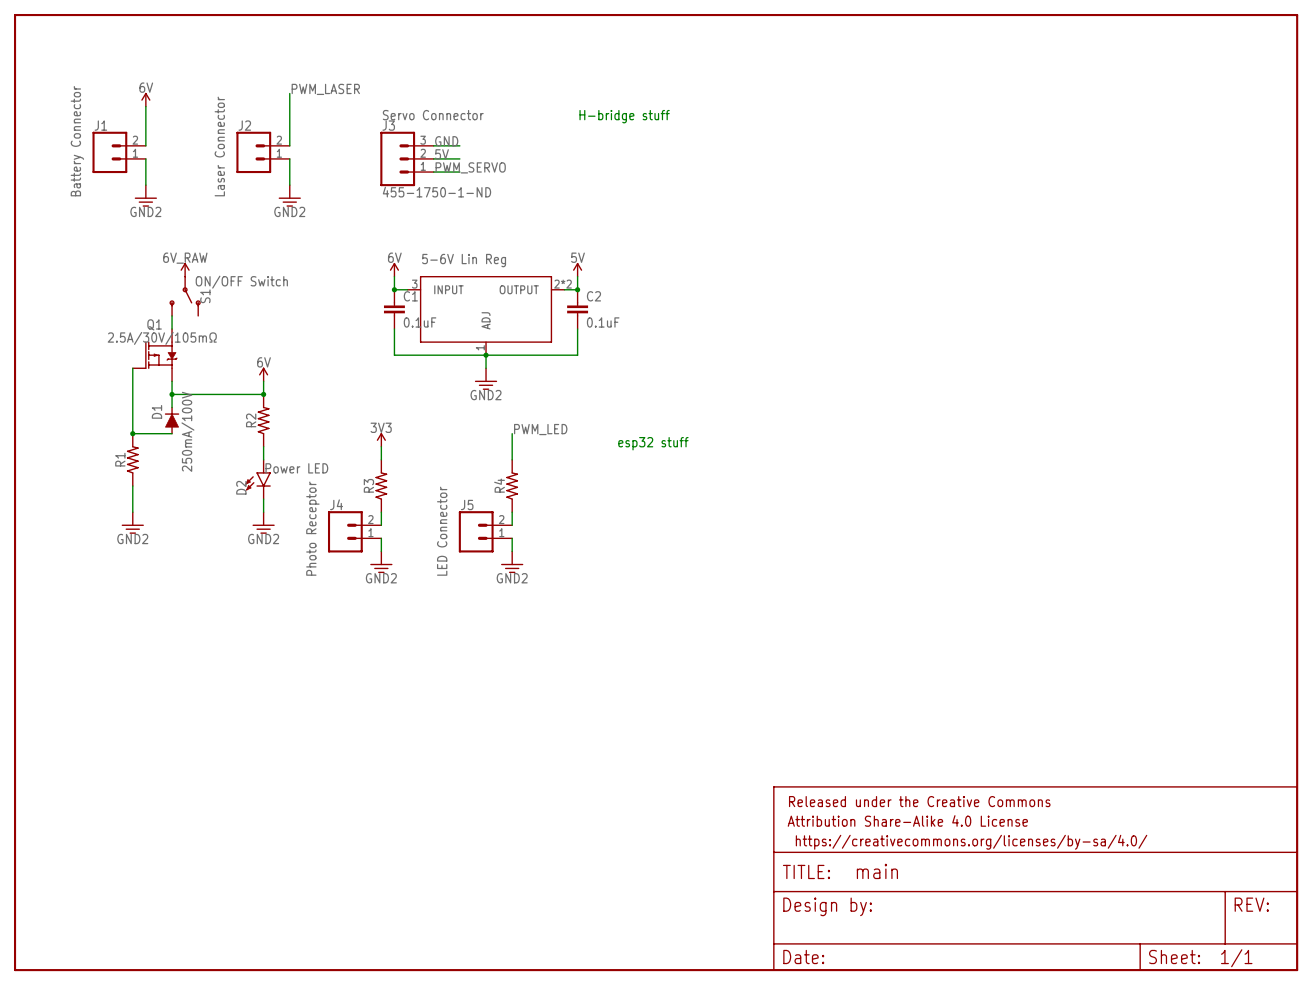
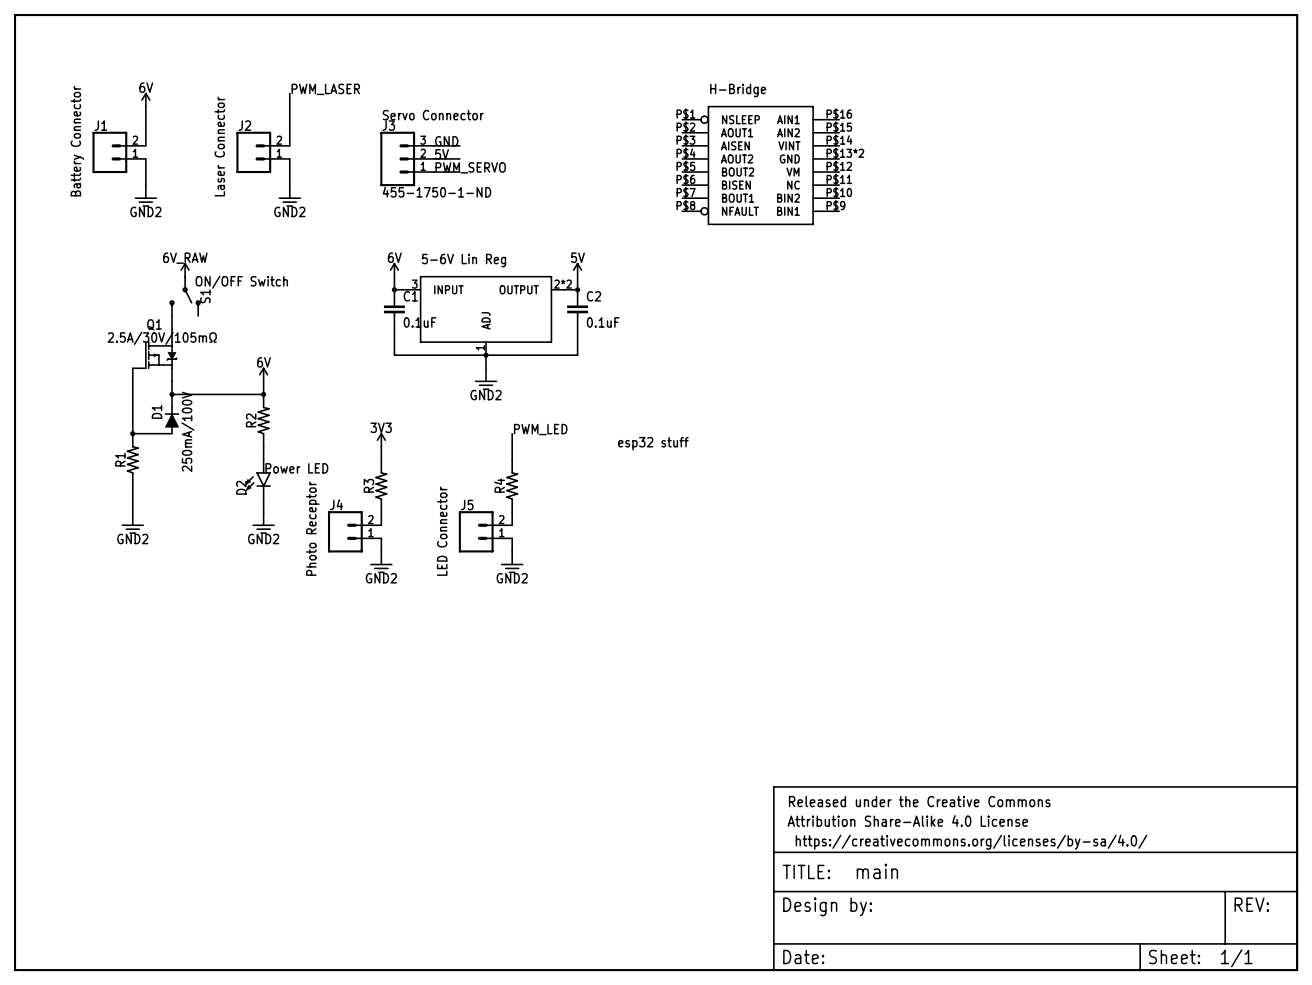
text: H-bridge stuff (624, 116) -> none
part: none -> (760, 165)

